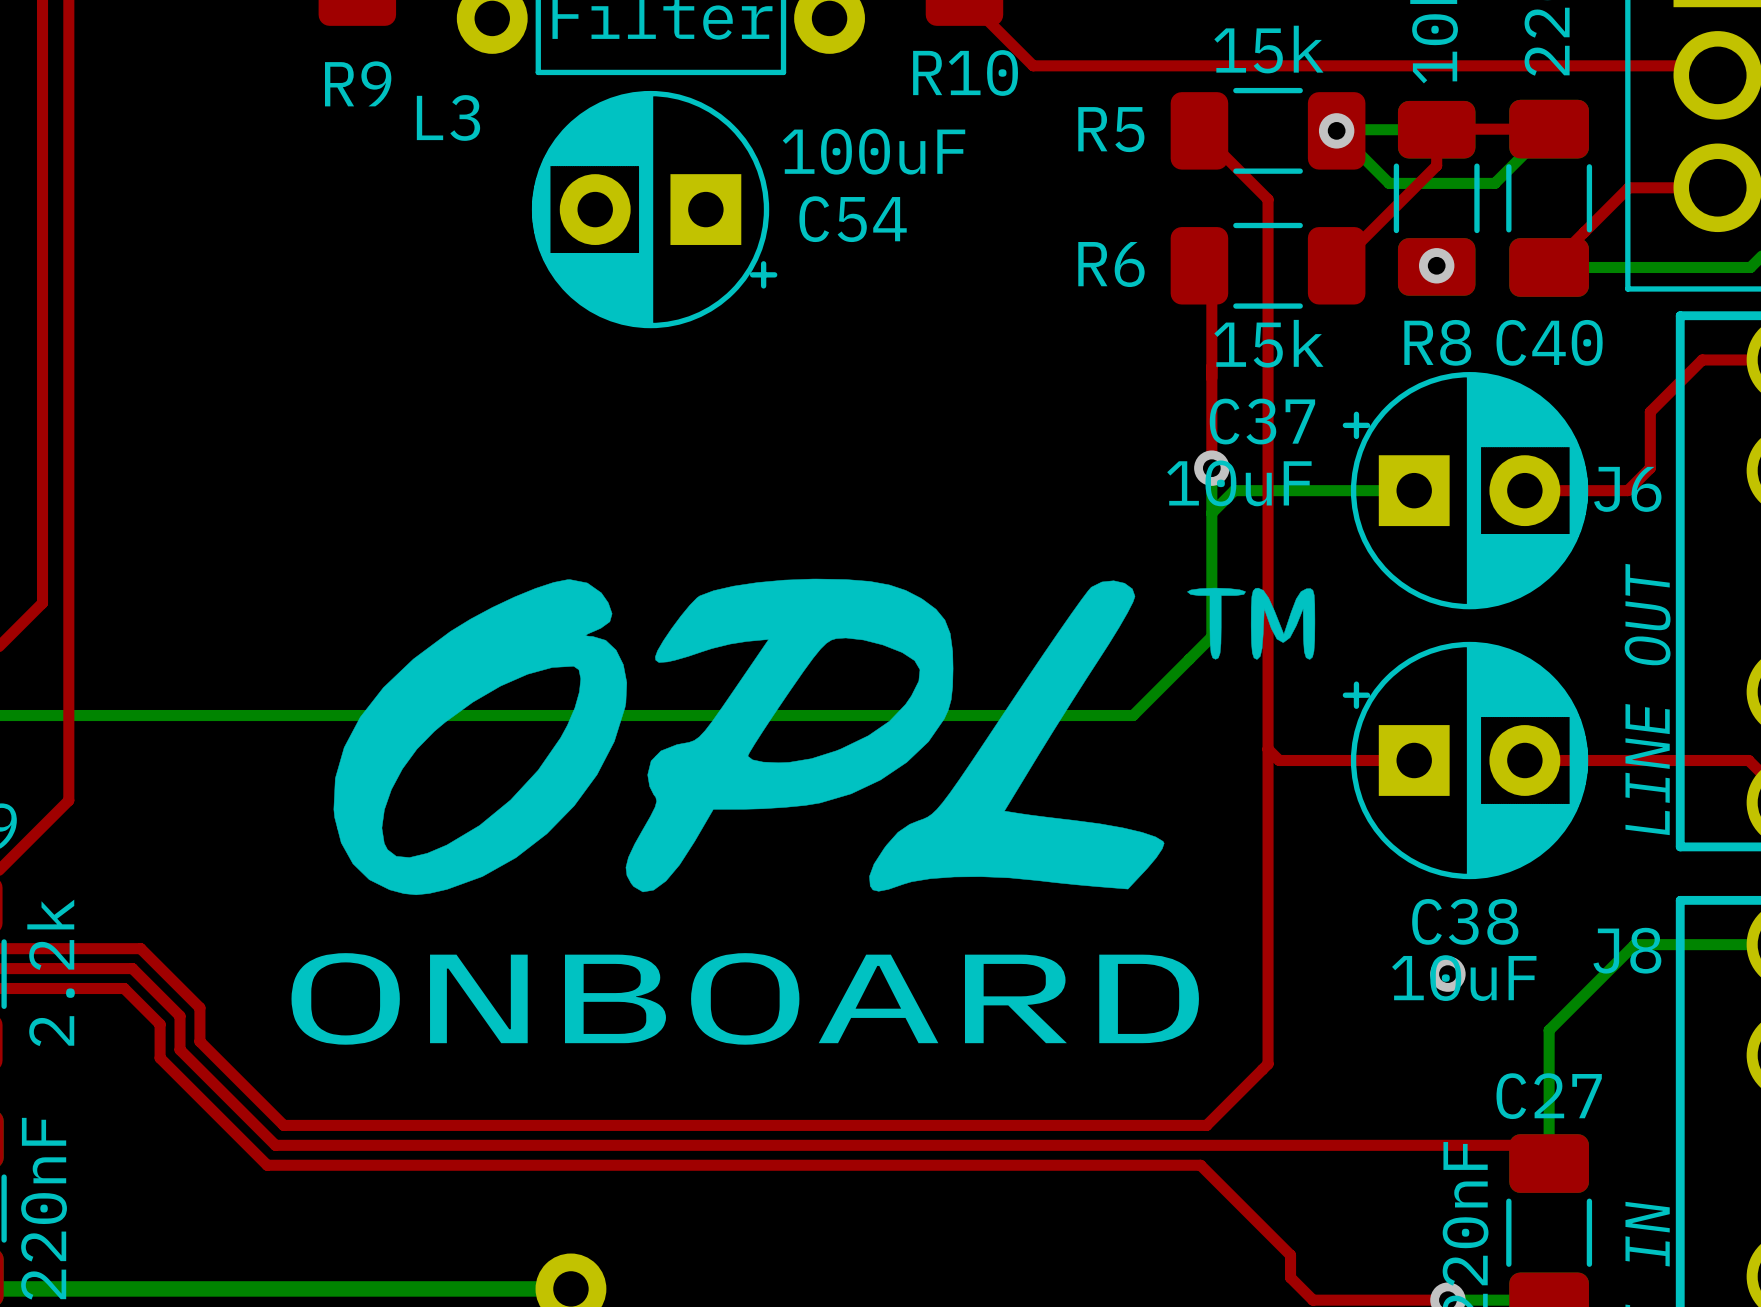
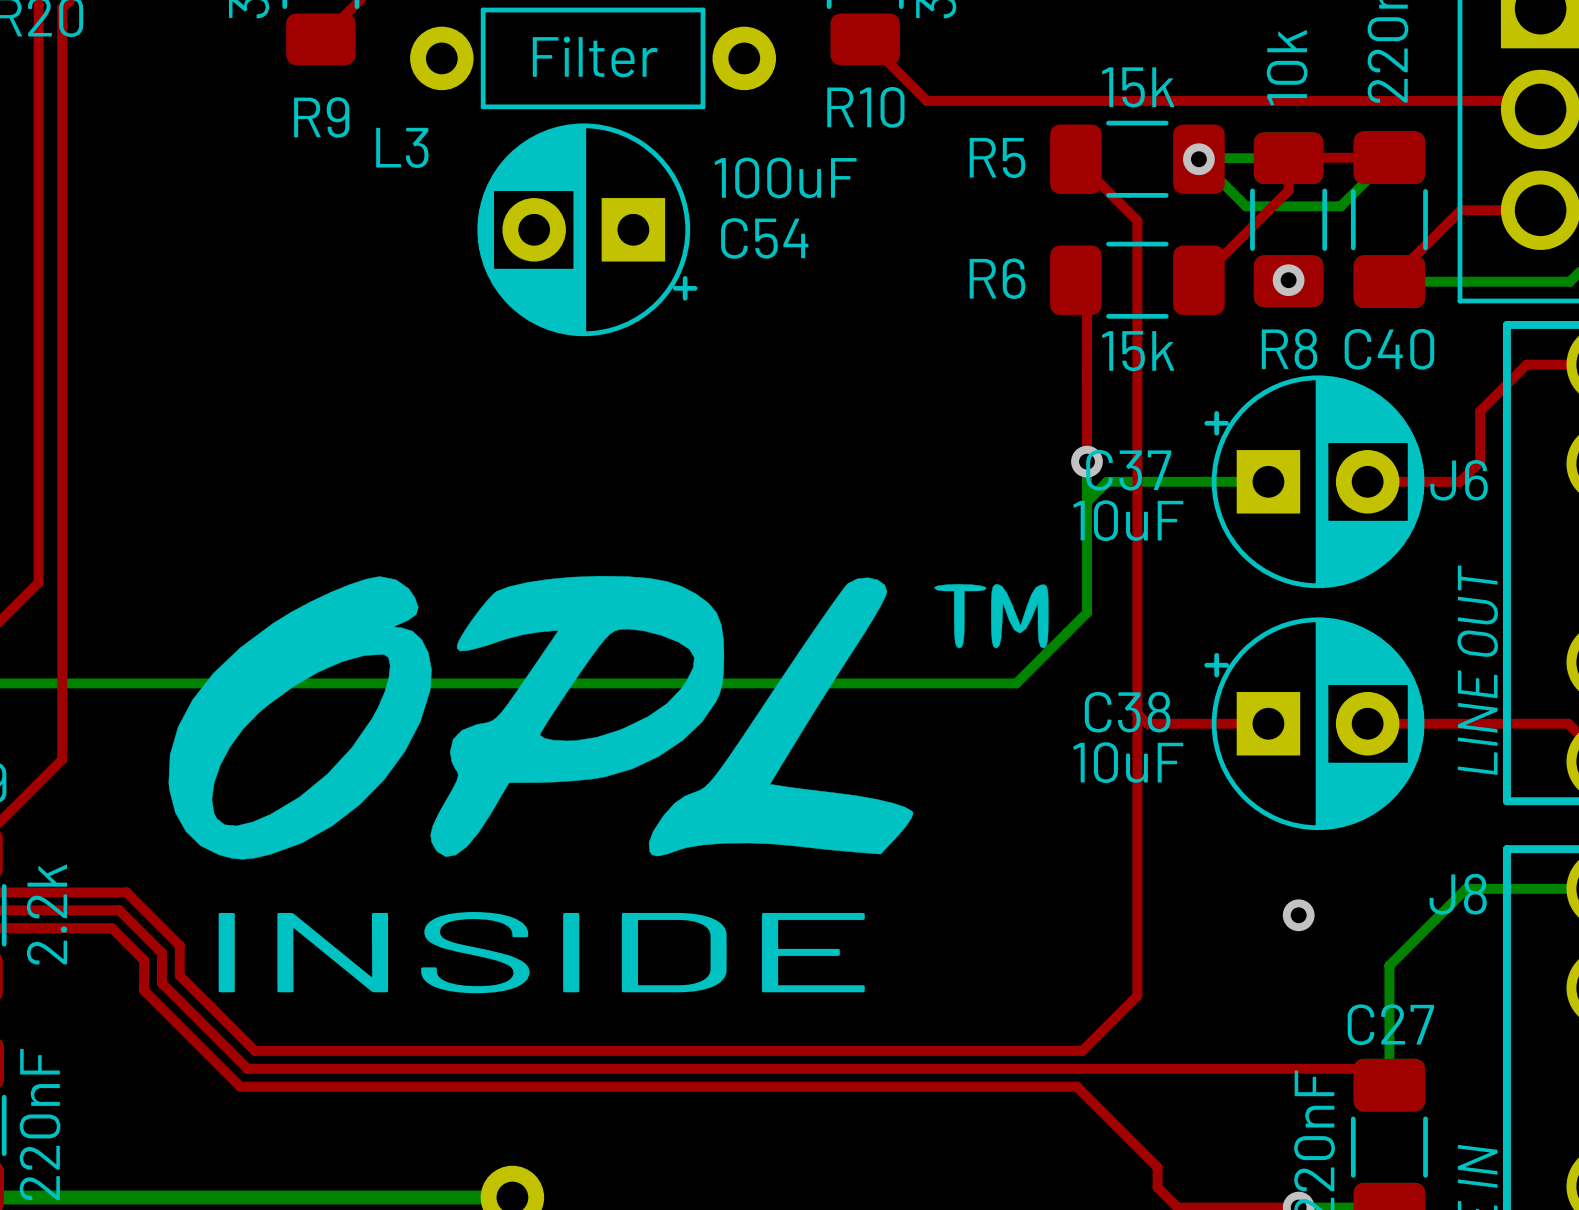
C37 name position: C37 (1262, 421) -> C37 (1128, 470)
C37 value position: 10uF (1239, 483) -> 10uF (1128, 520)
drawing position: (824, 736) -> (608, 717)
C38 name position: C38 (1465, 921) -> C38 (1127, 712)
C38 value position: 10uF (1464, 978) -> 10uF (1128, 762)
text: ONBOARD (745, 998) -> none
text: none -> INSIDE (541, 952)

